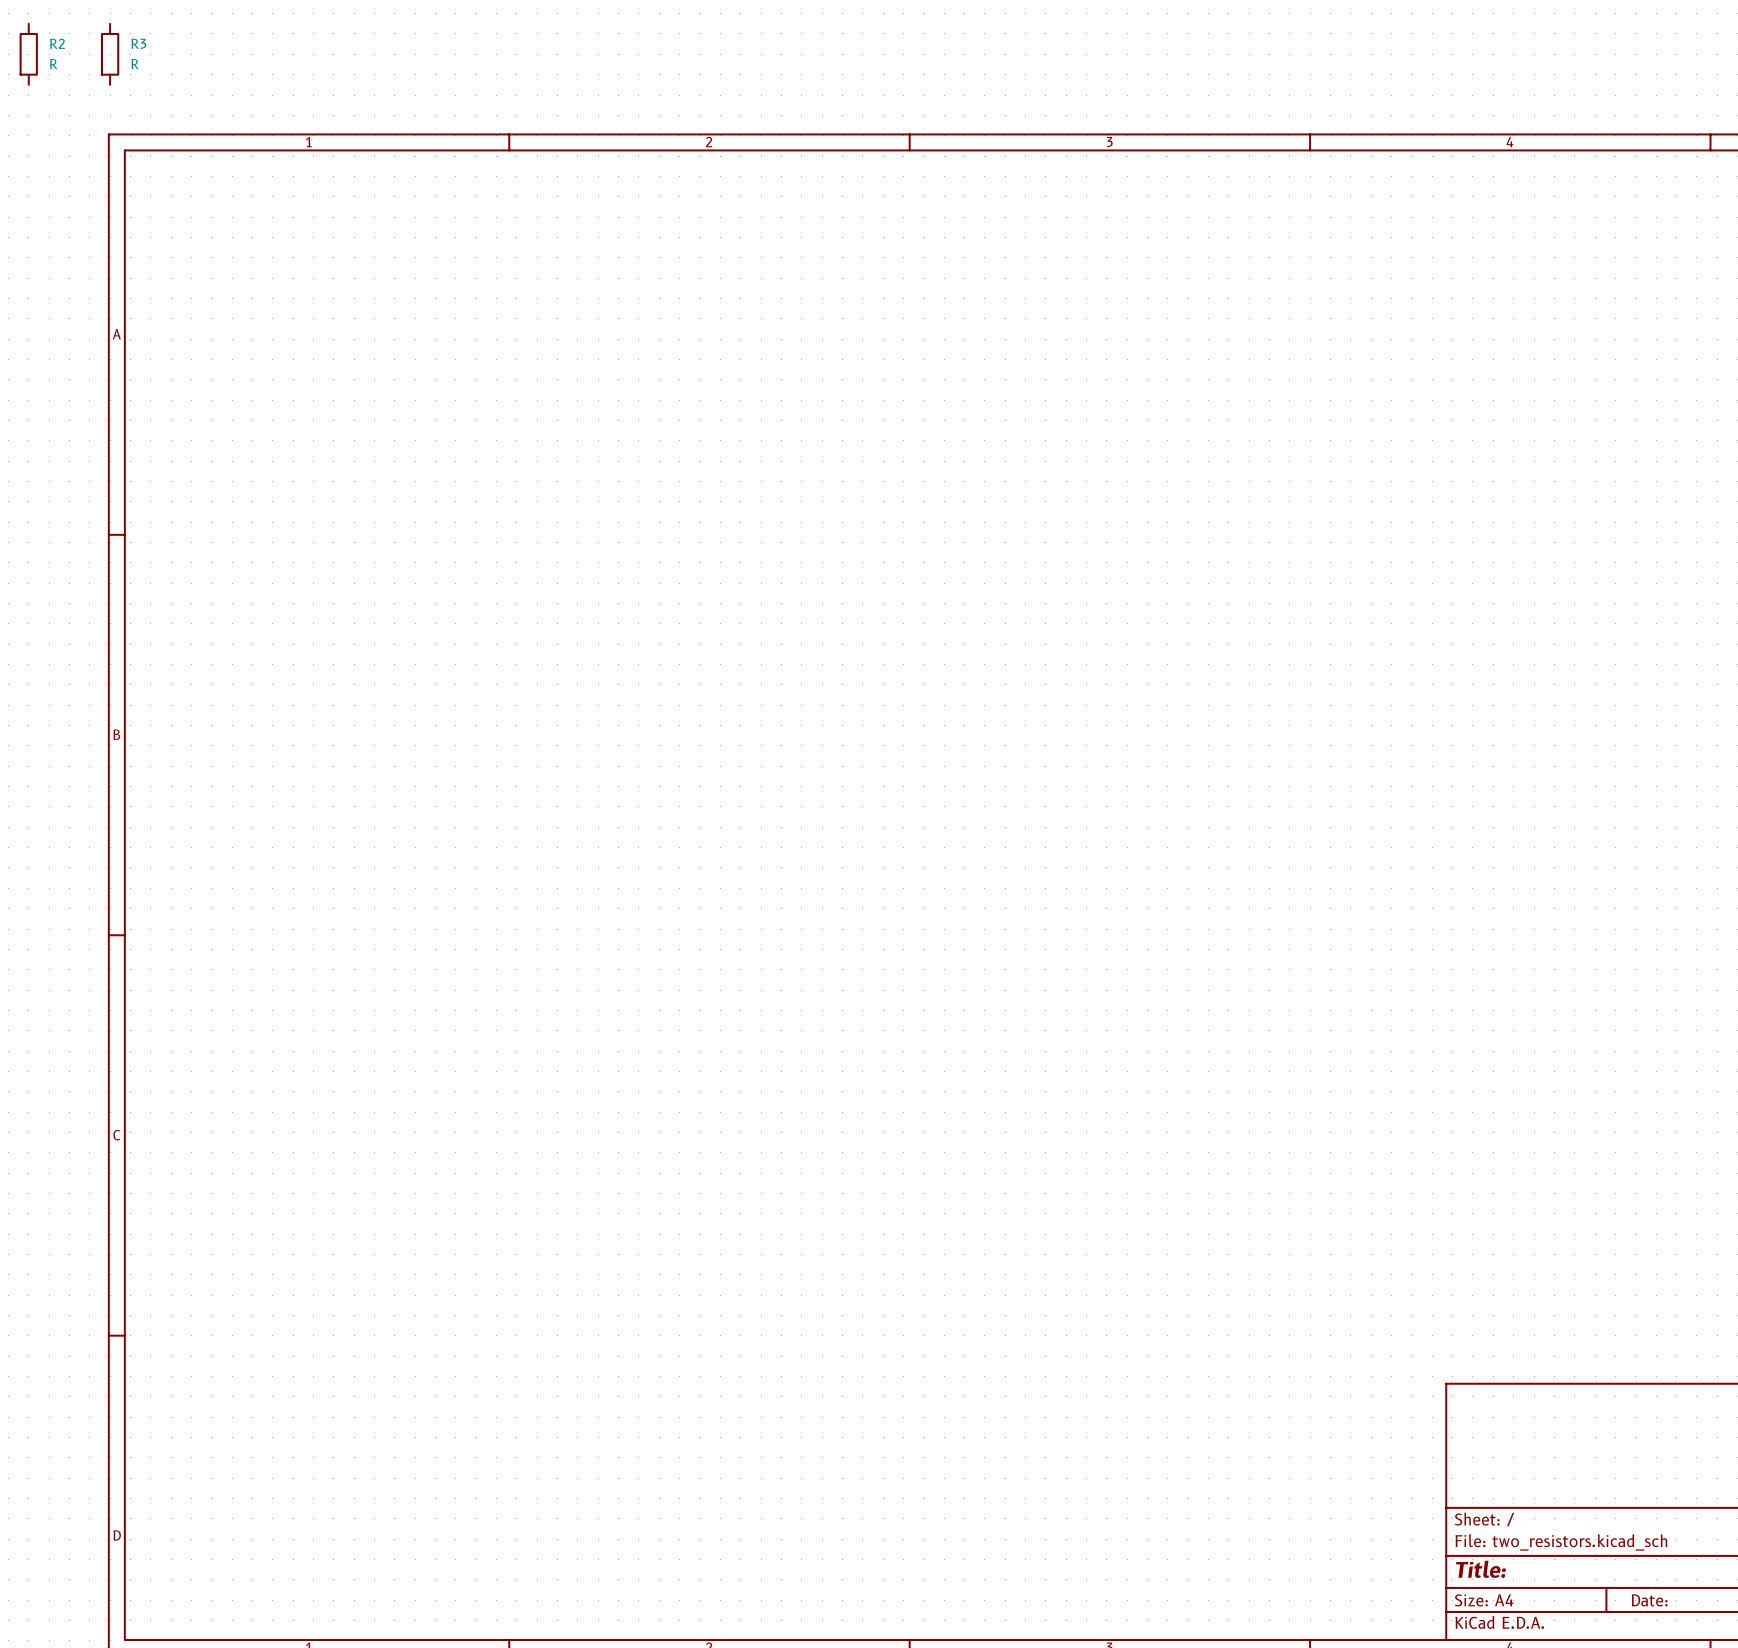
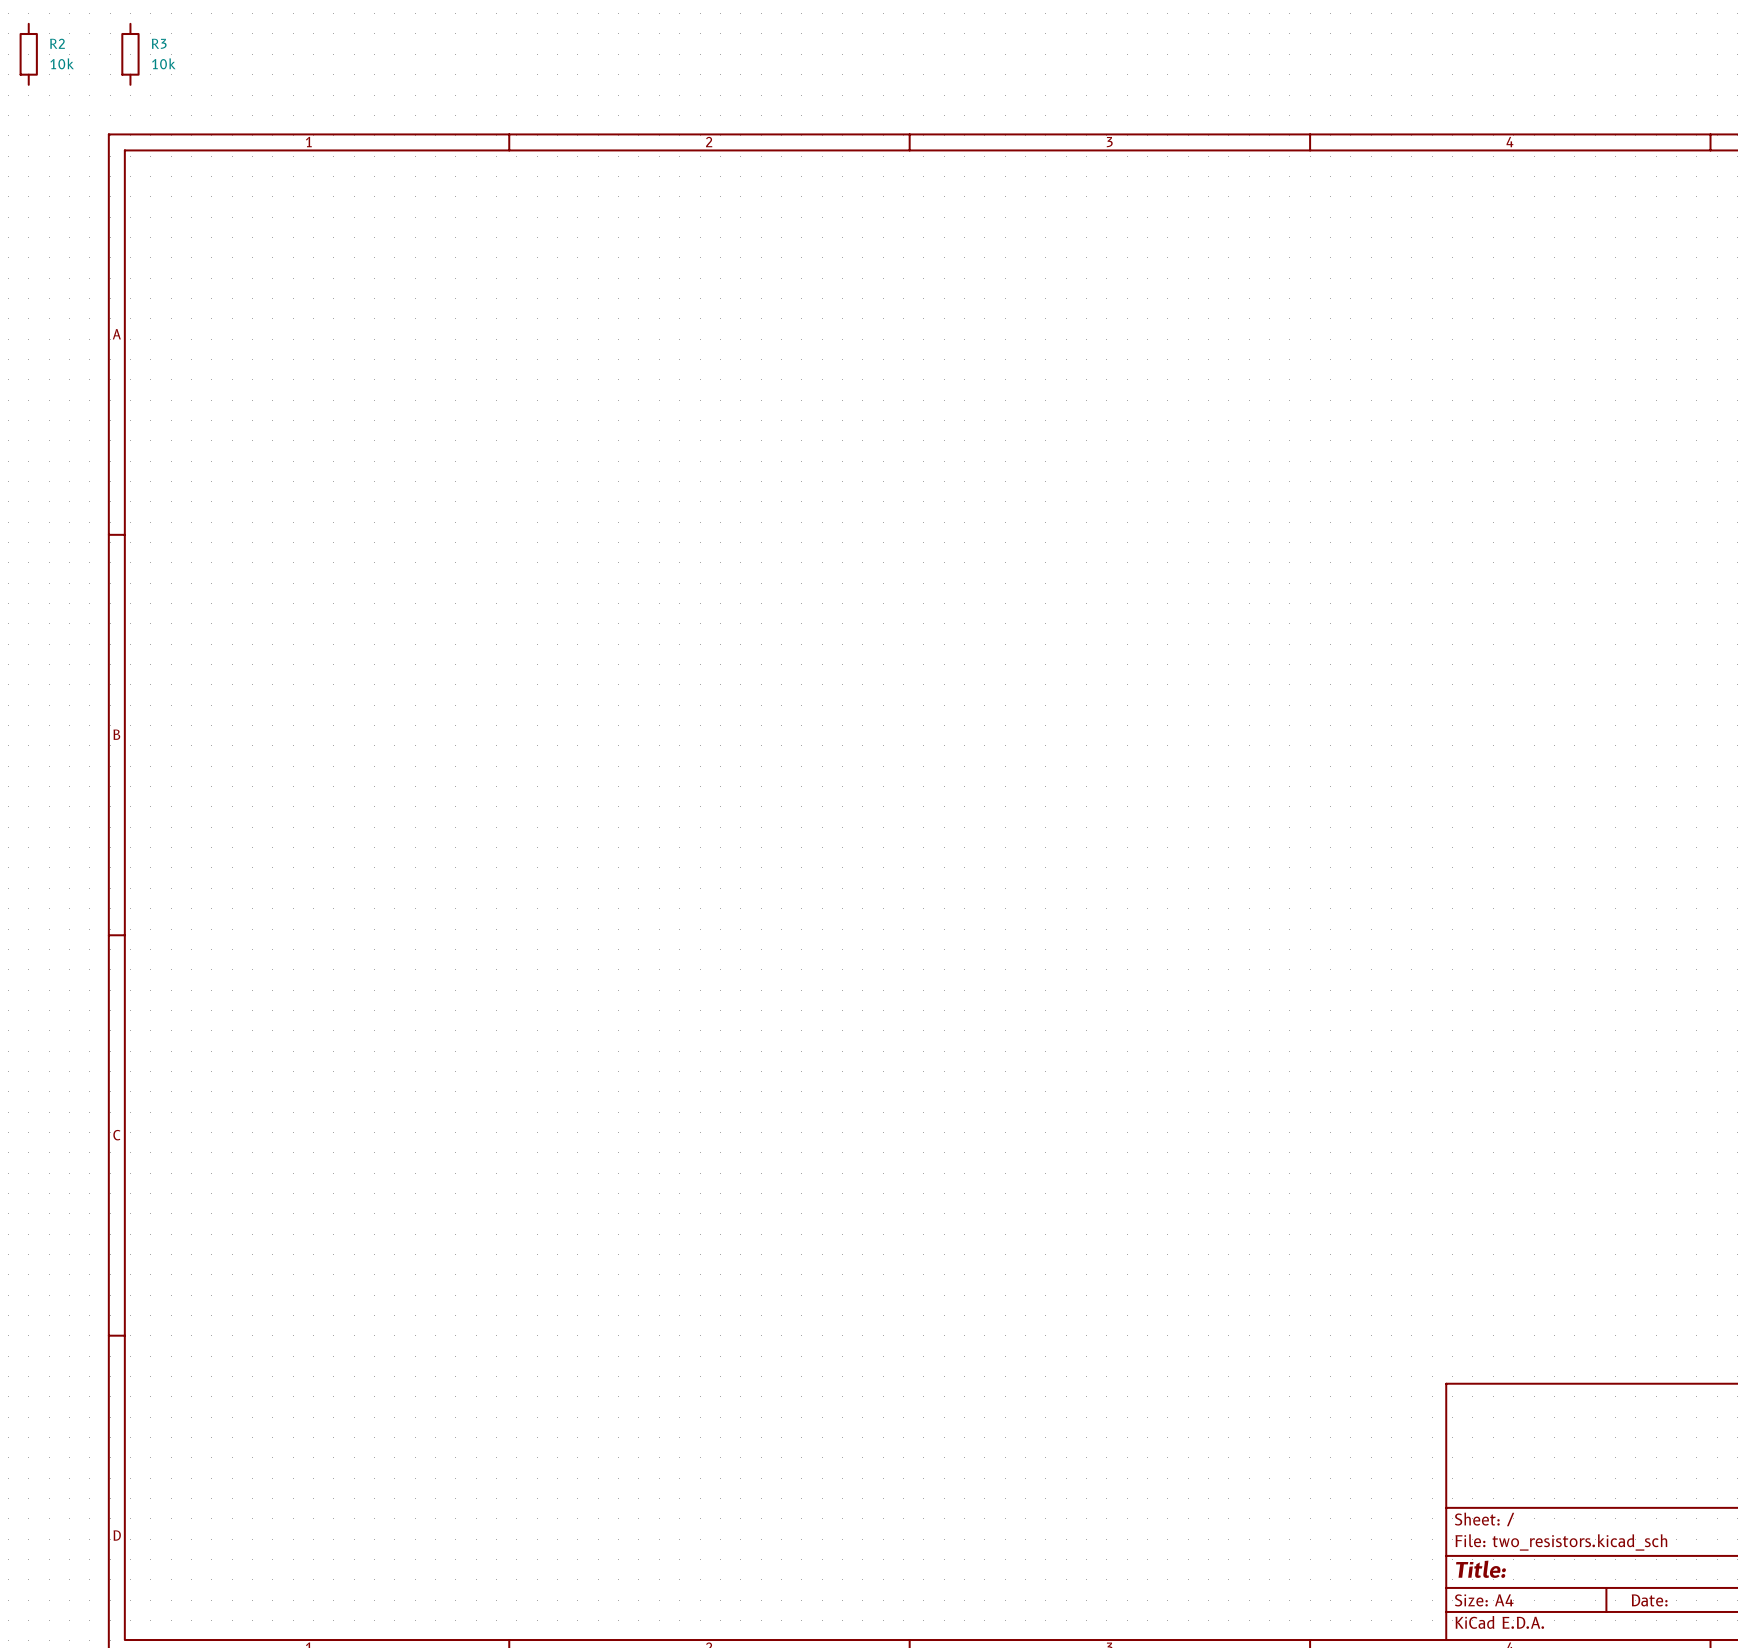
R3 position: (110, 54) -> (130, 54)
R2 value: R (53, 64) -> 10k (62, 63)
R3 value: R (135, 64) -> 10k (163, 63)

